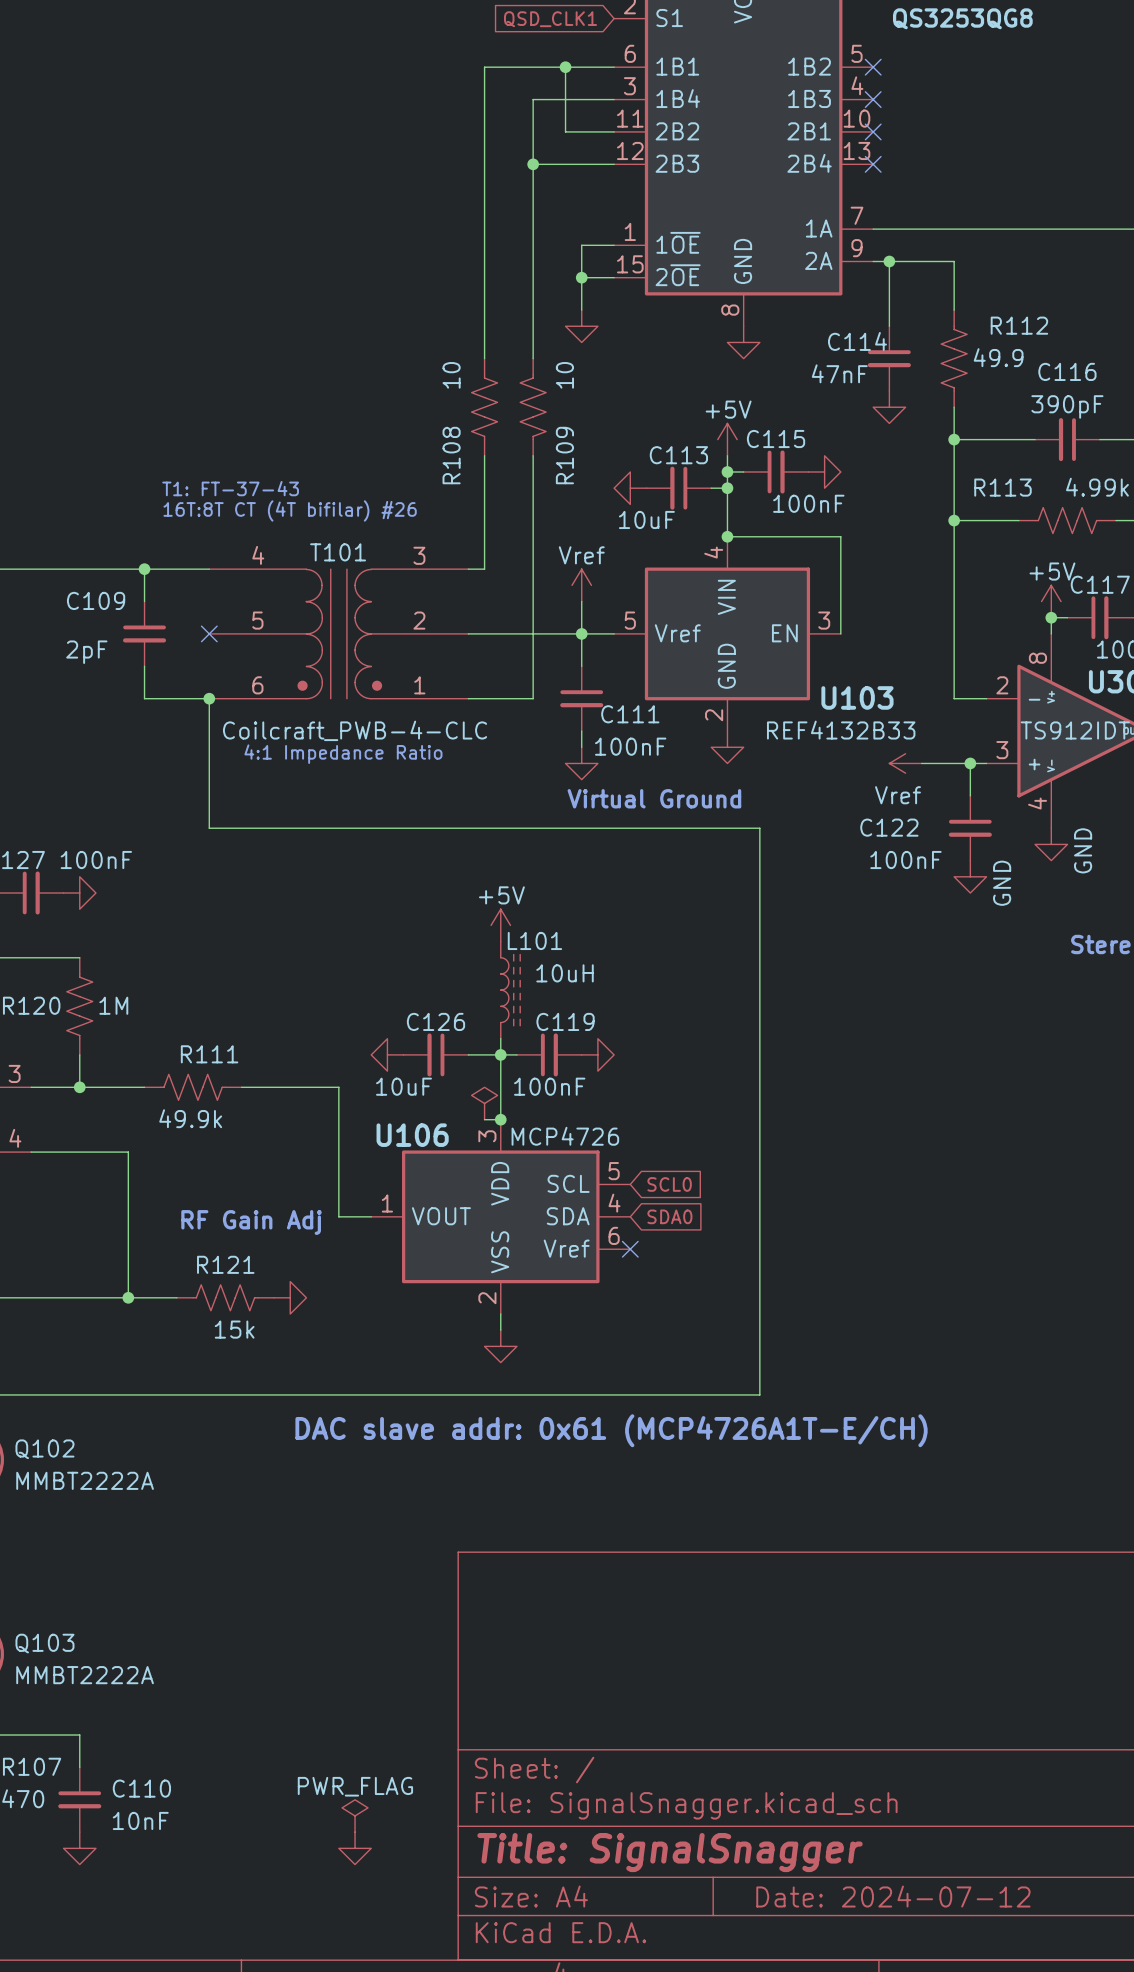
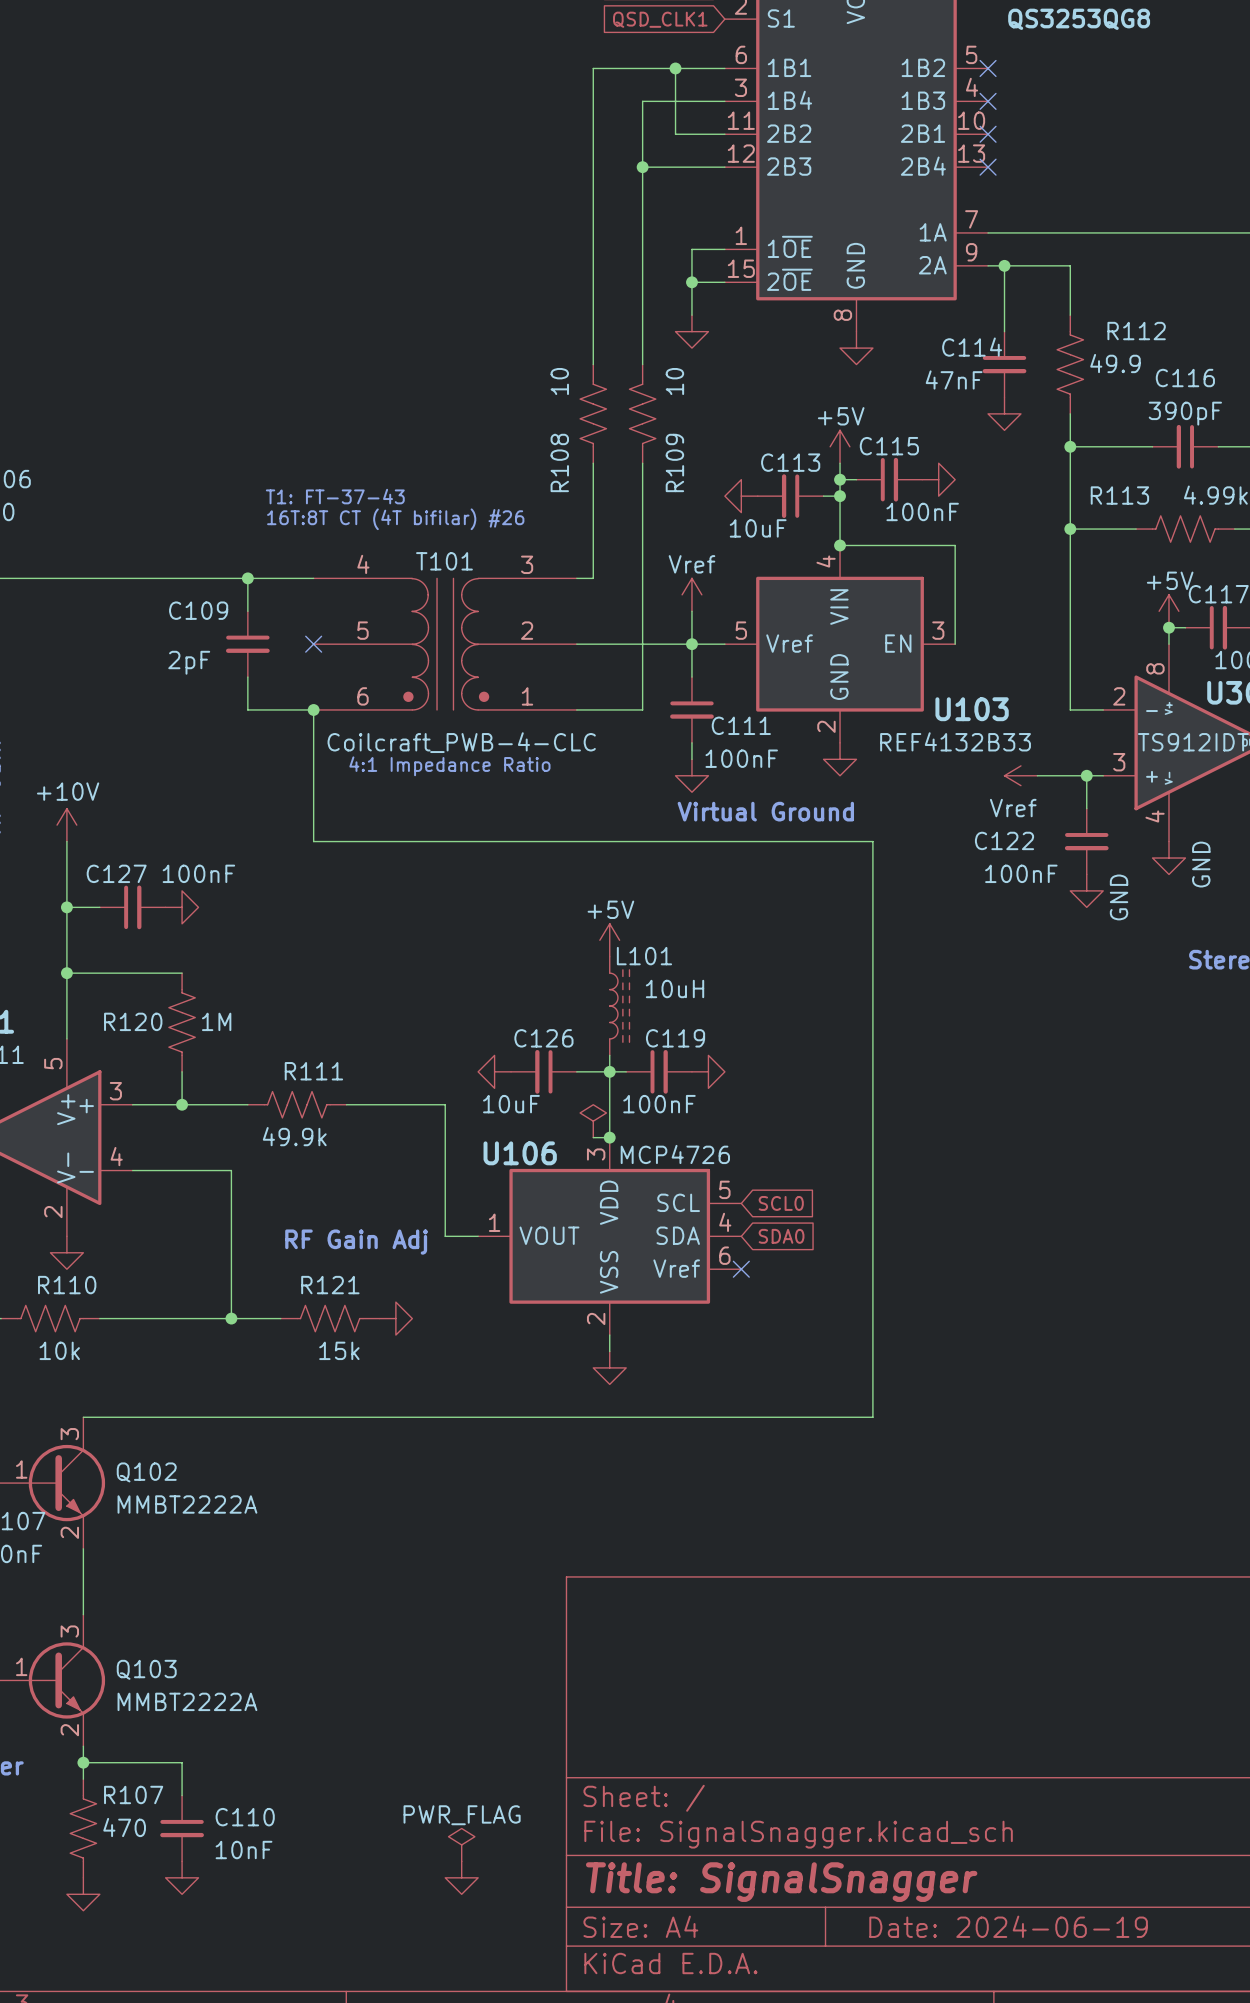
text: DAC slave addr: 0x61 (MCP4726A1T-E/CH) (611, 1430) -> none
title block: Date: 2024-07-12 (893, 1896) -> Date: 2024-06-19 (1008, 1926)

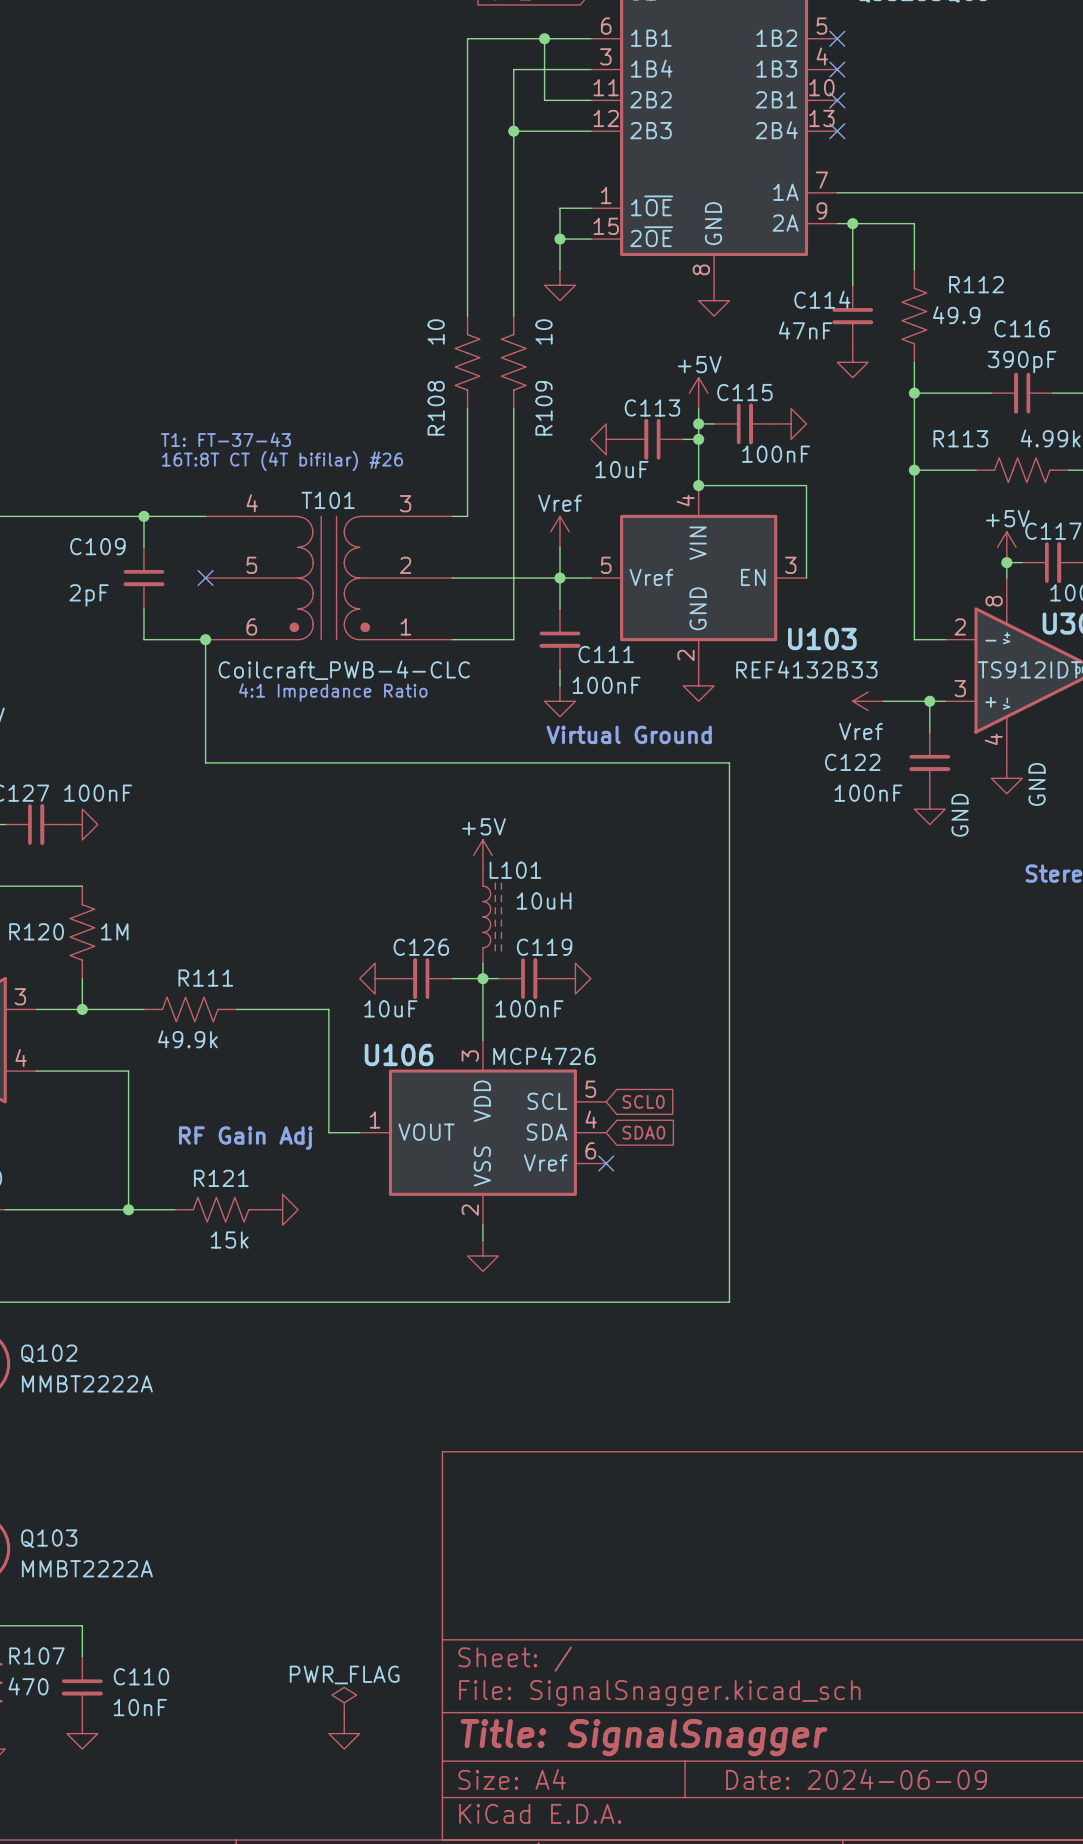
power symbol: (593, 1121) -> none
wire: (593, 1137) (609, 1137) -> none
junction: (609, 1137) -> none
title block: Date: 2024-06-19 (1008, 1926) -> Date: 2024-06-09 (856, 1779)

